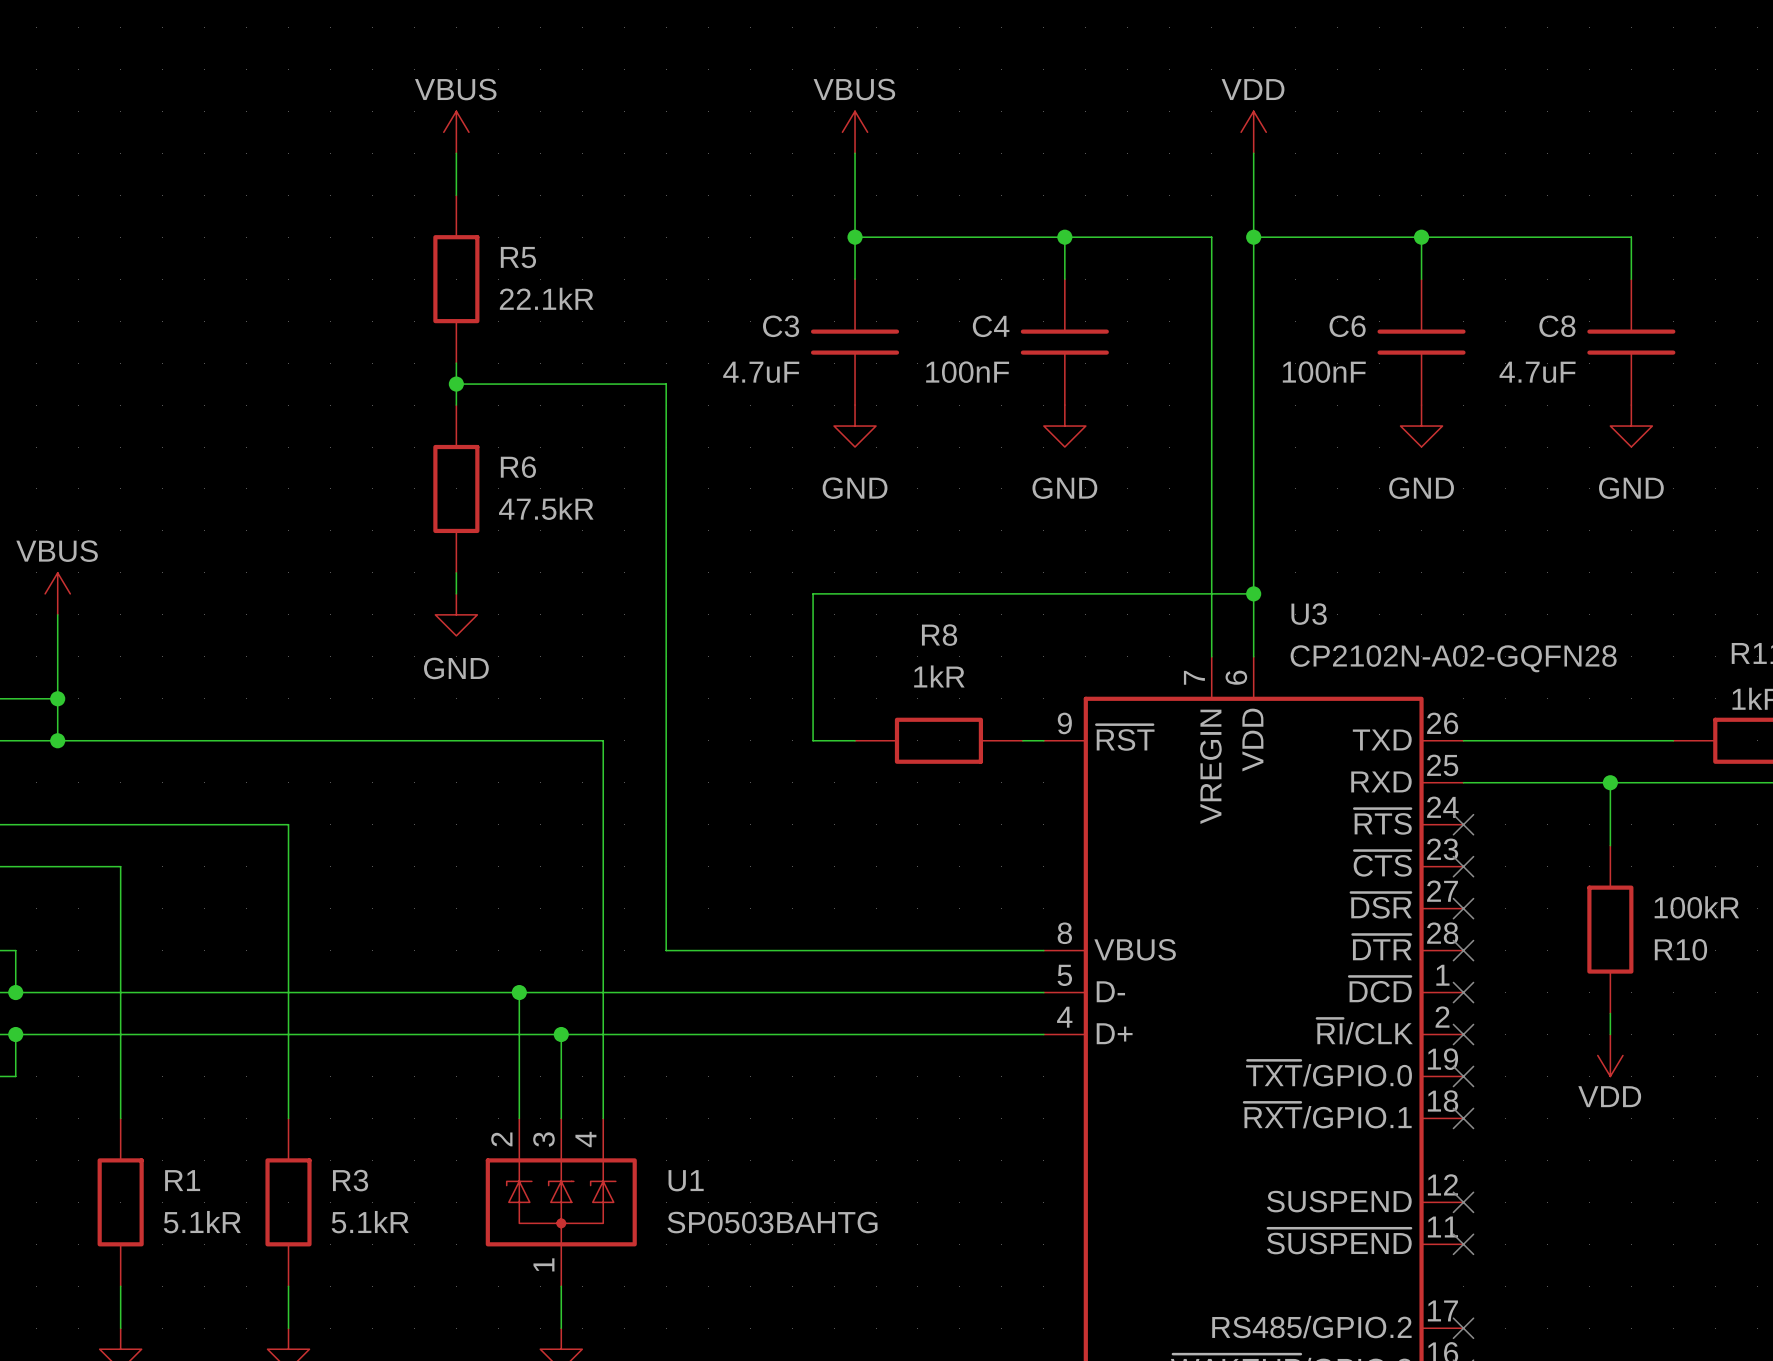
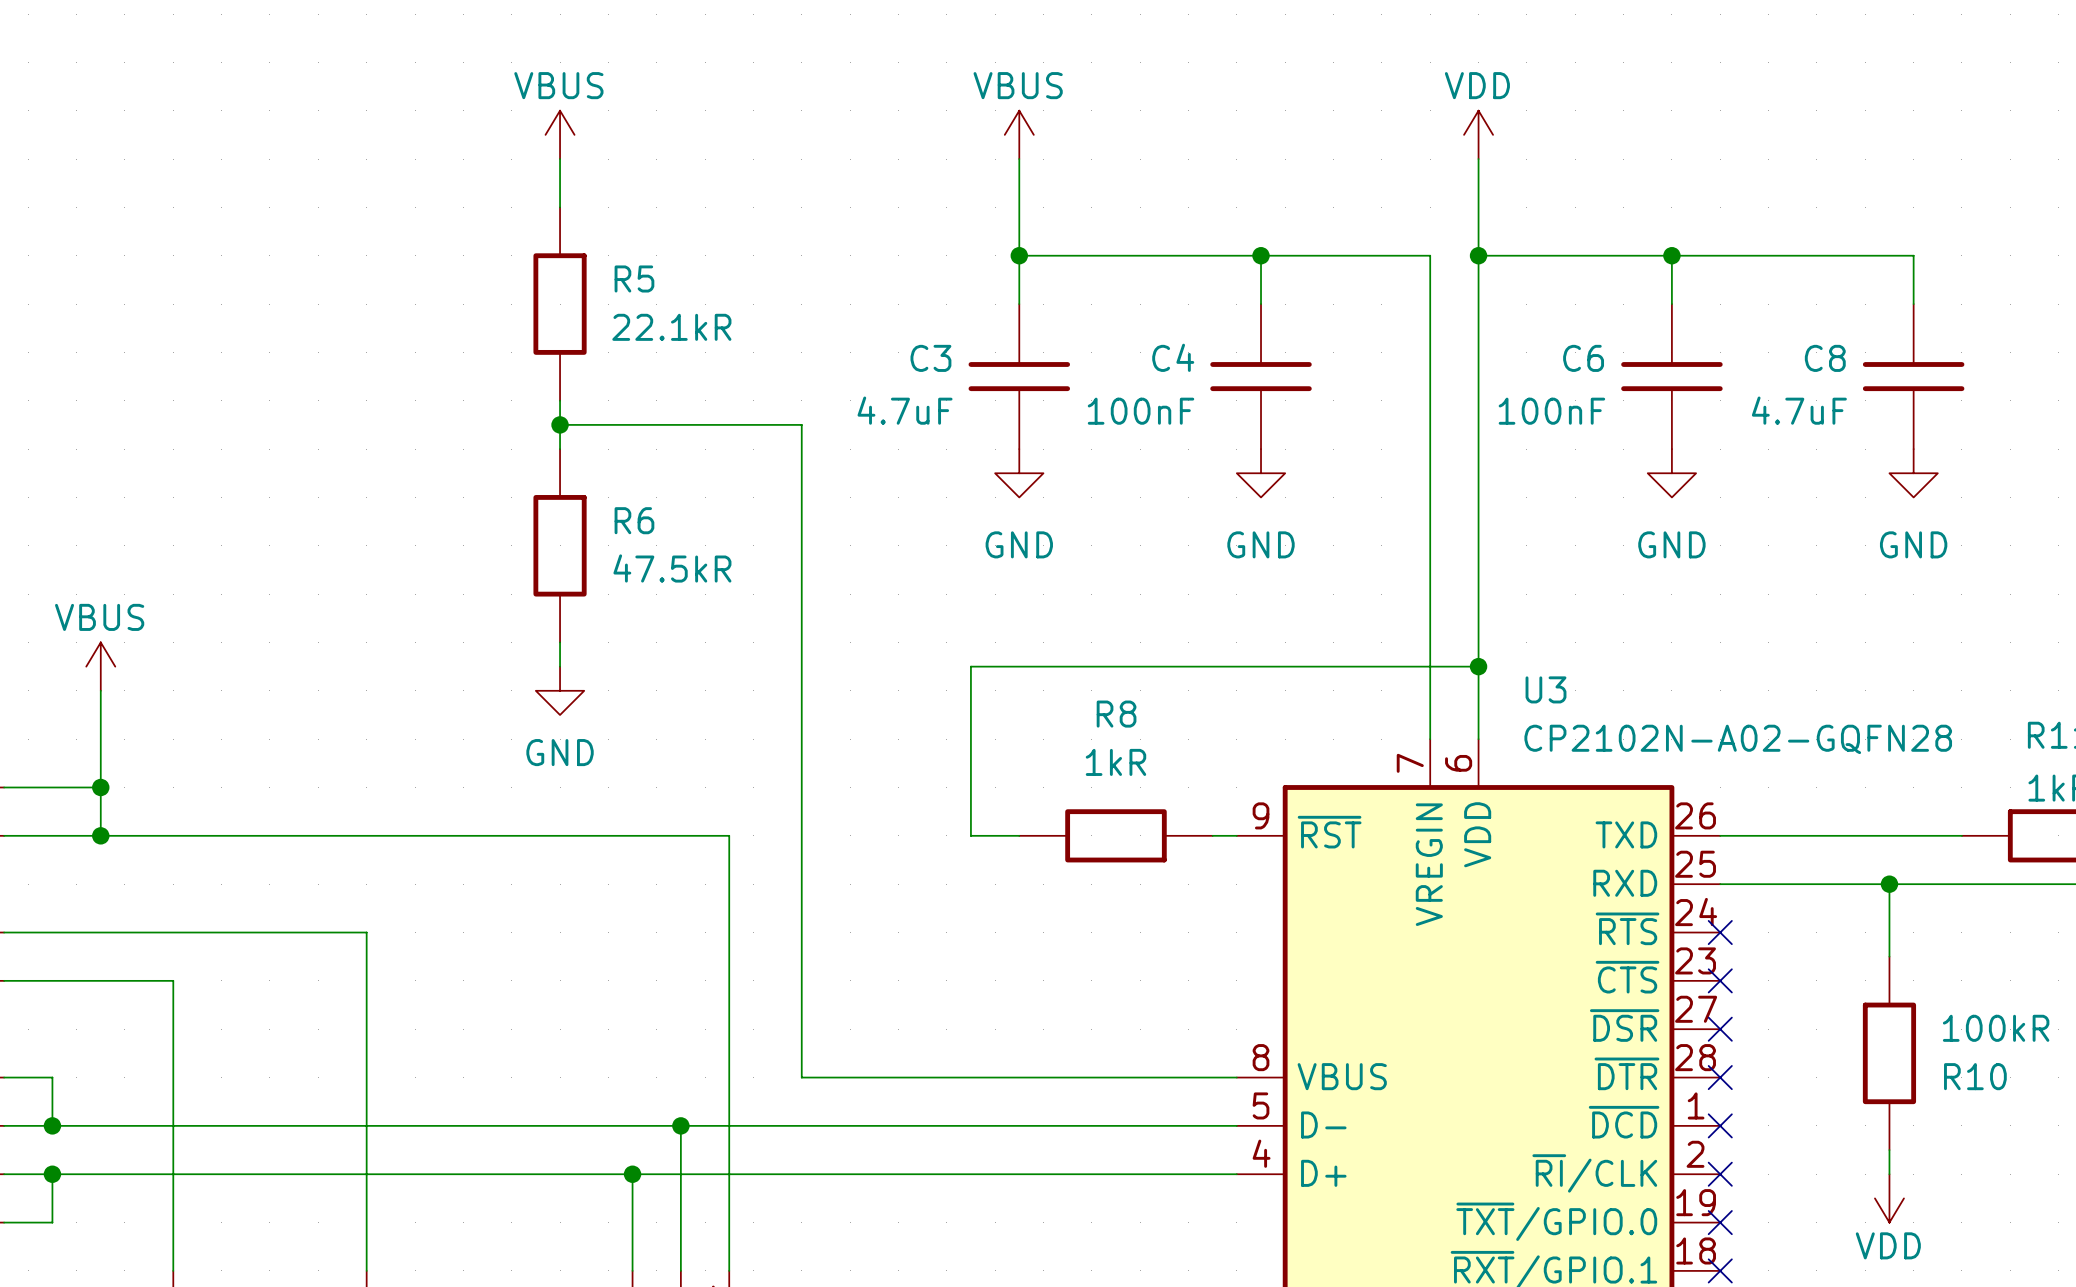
wire: (519, 992) (519, 1034) -> (680, 1125) (680, 1174)
junction: (519, 992) -> none
junction: none -> (680, 1125)
junction: none -> (632, 1174)
junction: (561, 1034) -> none

